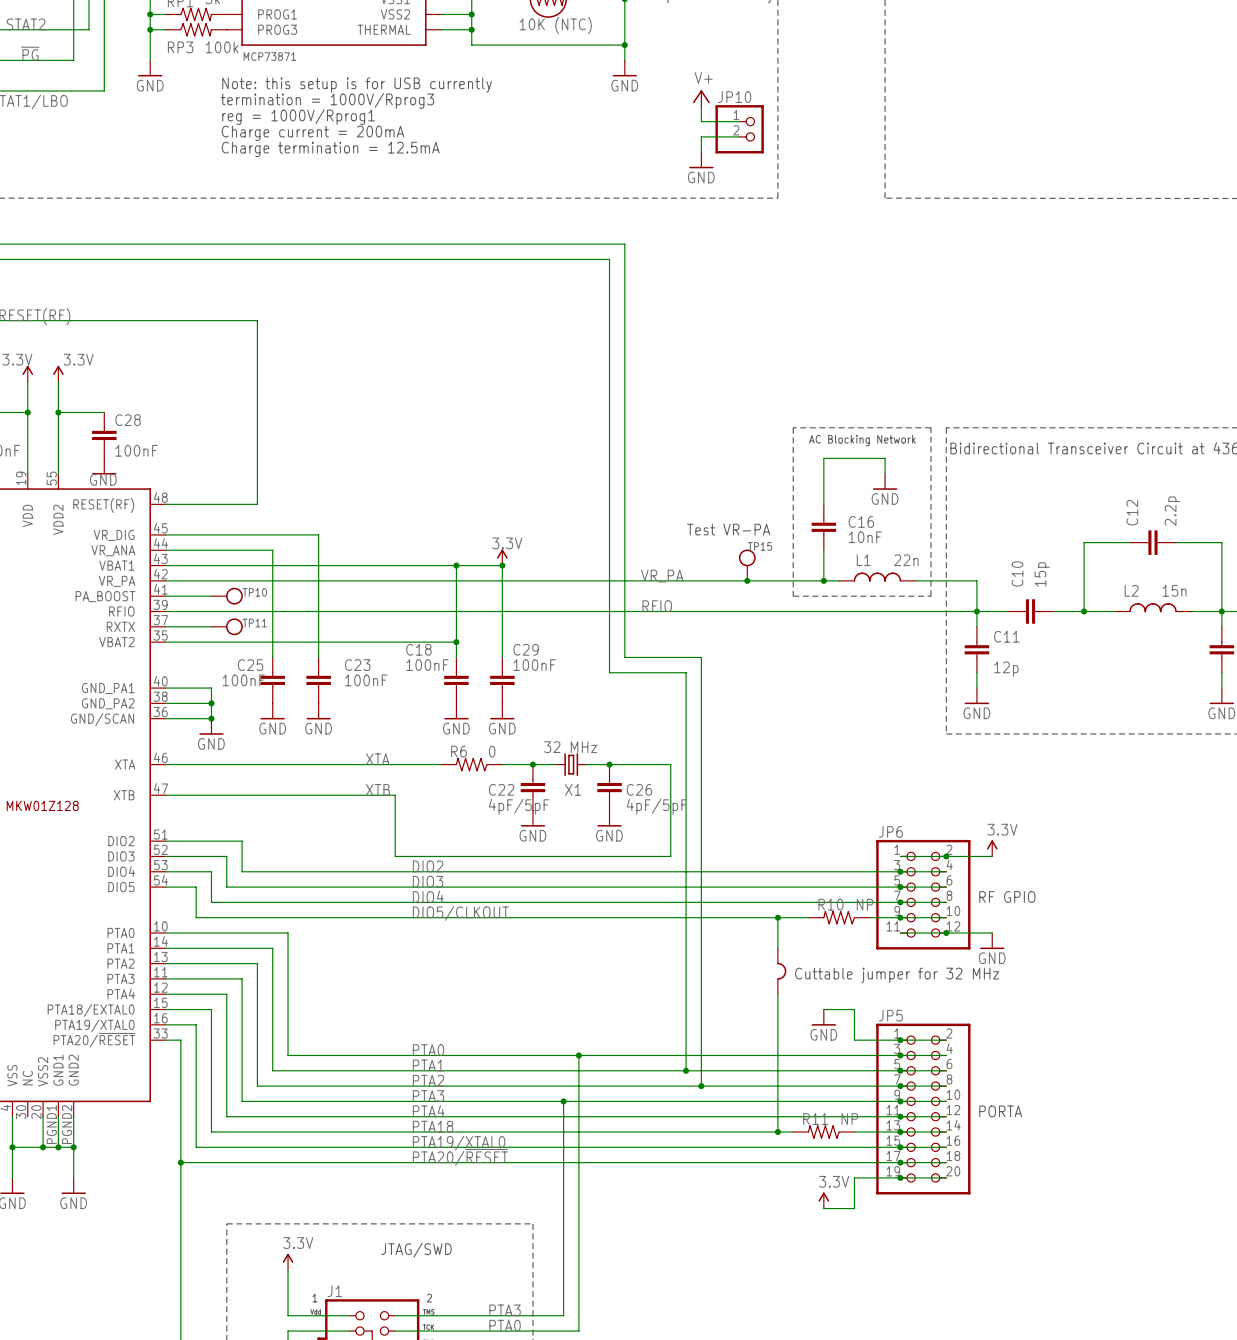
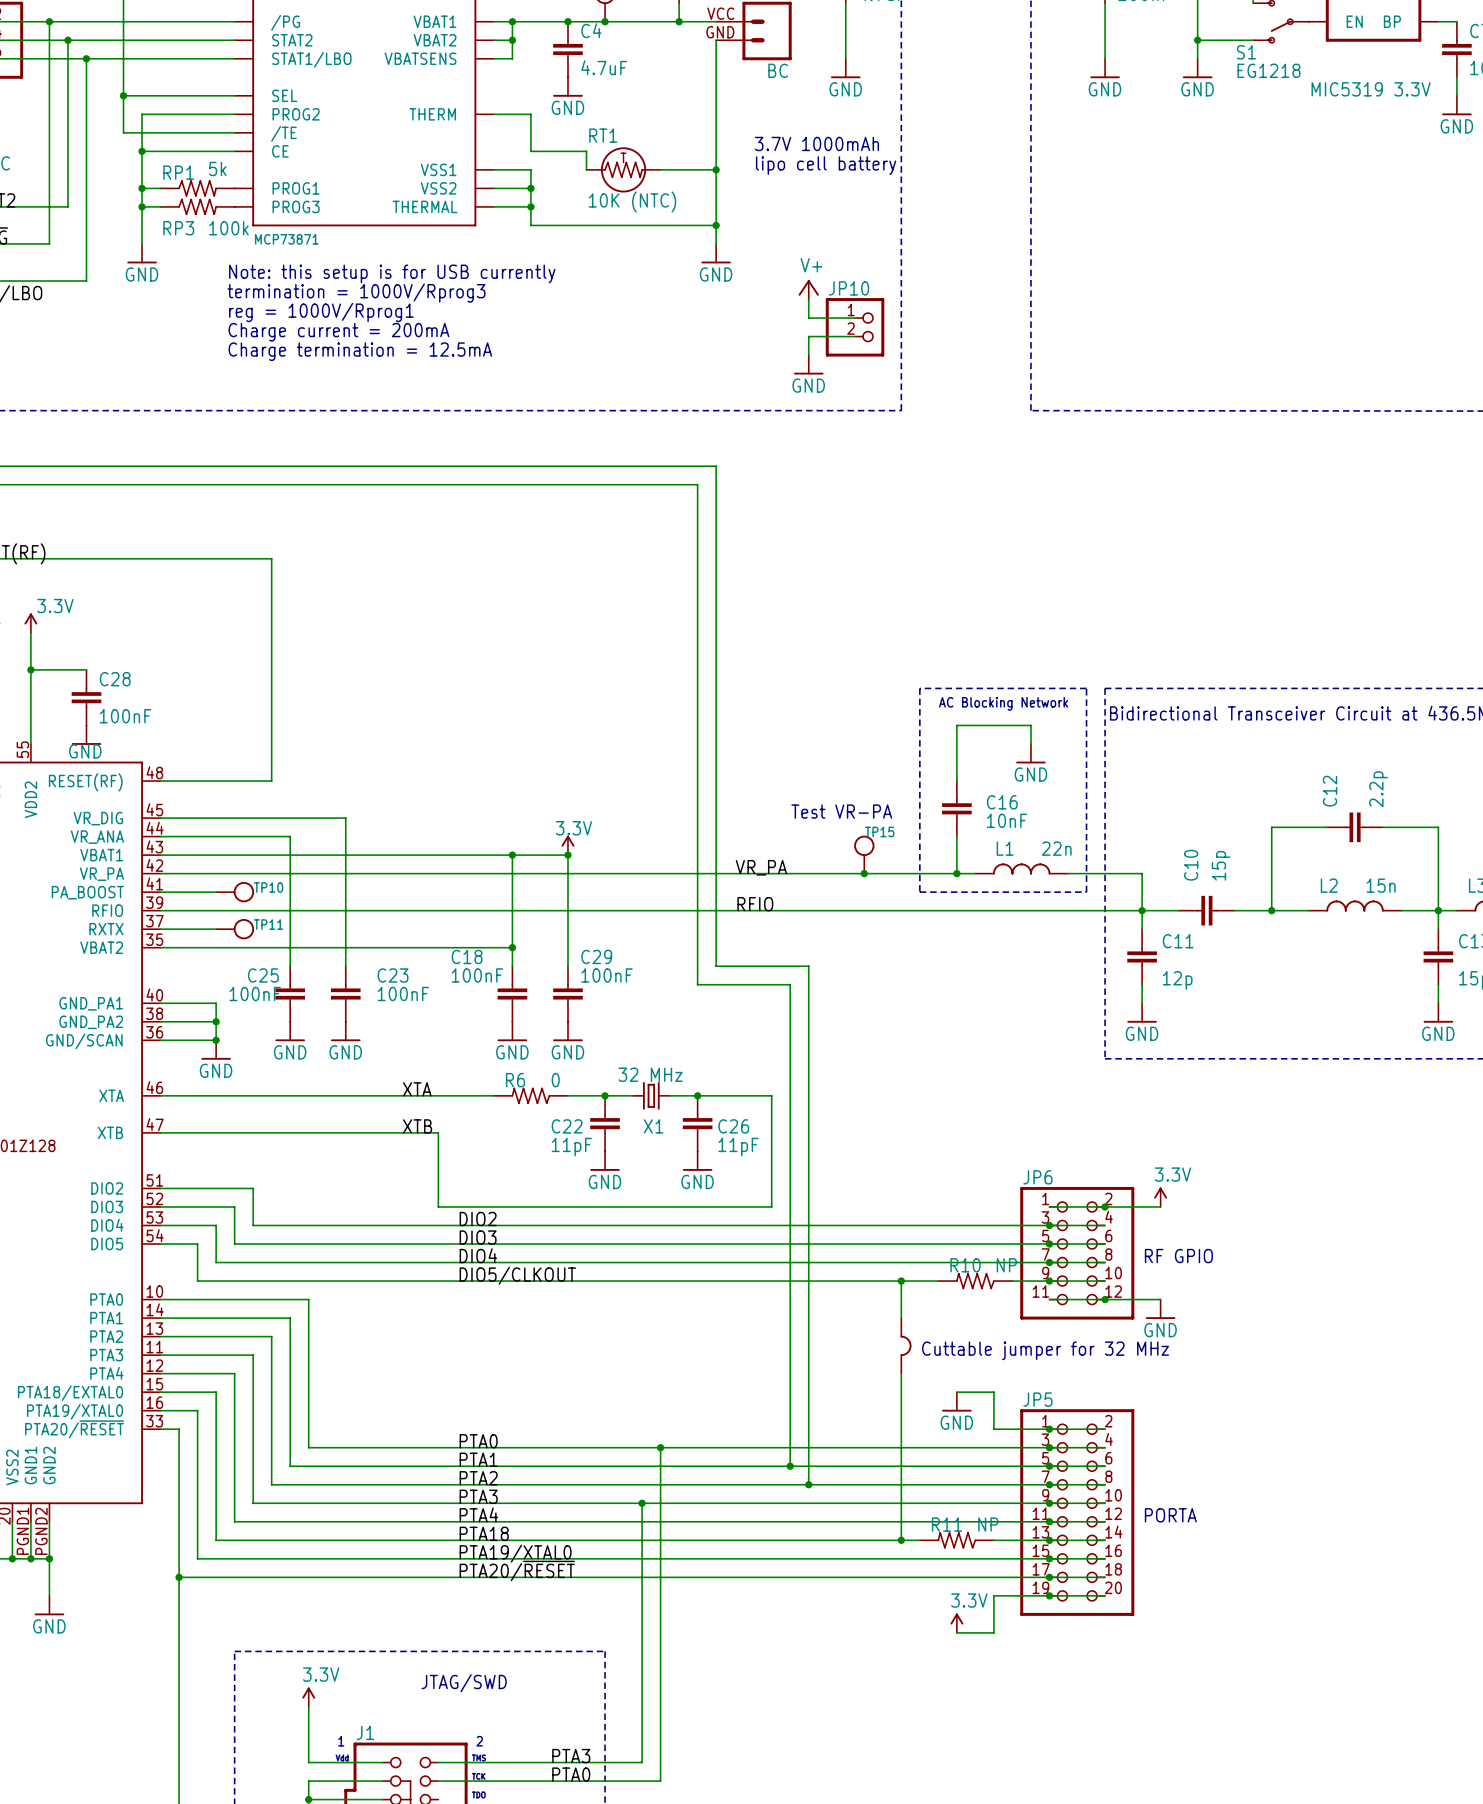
C22 value: 4pF/5pF (519, 806) -> 11pF (571, 1147)
C26 value: 4pF/5pF (656, 806) -> 11pF (738, 1147)

